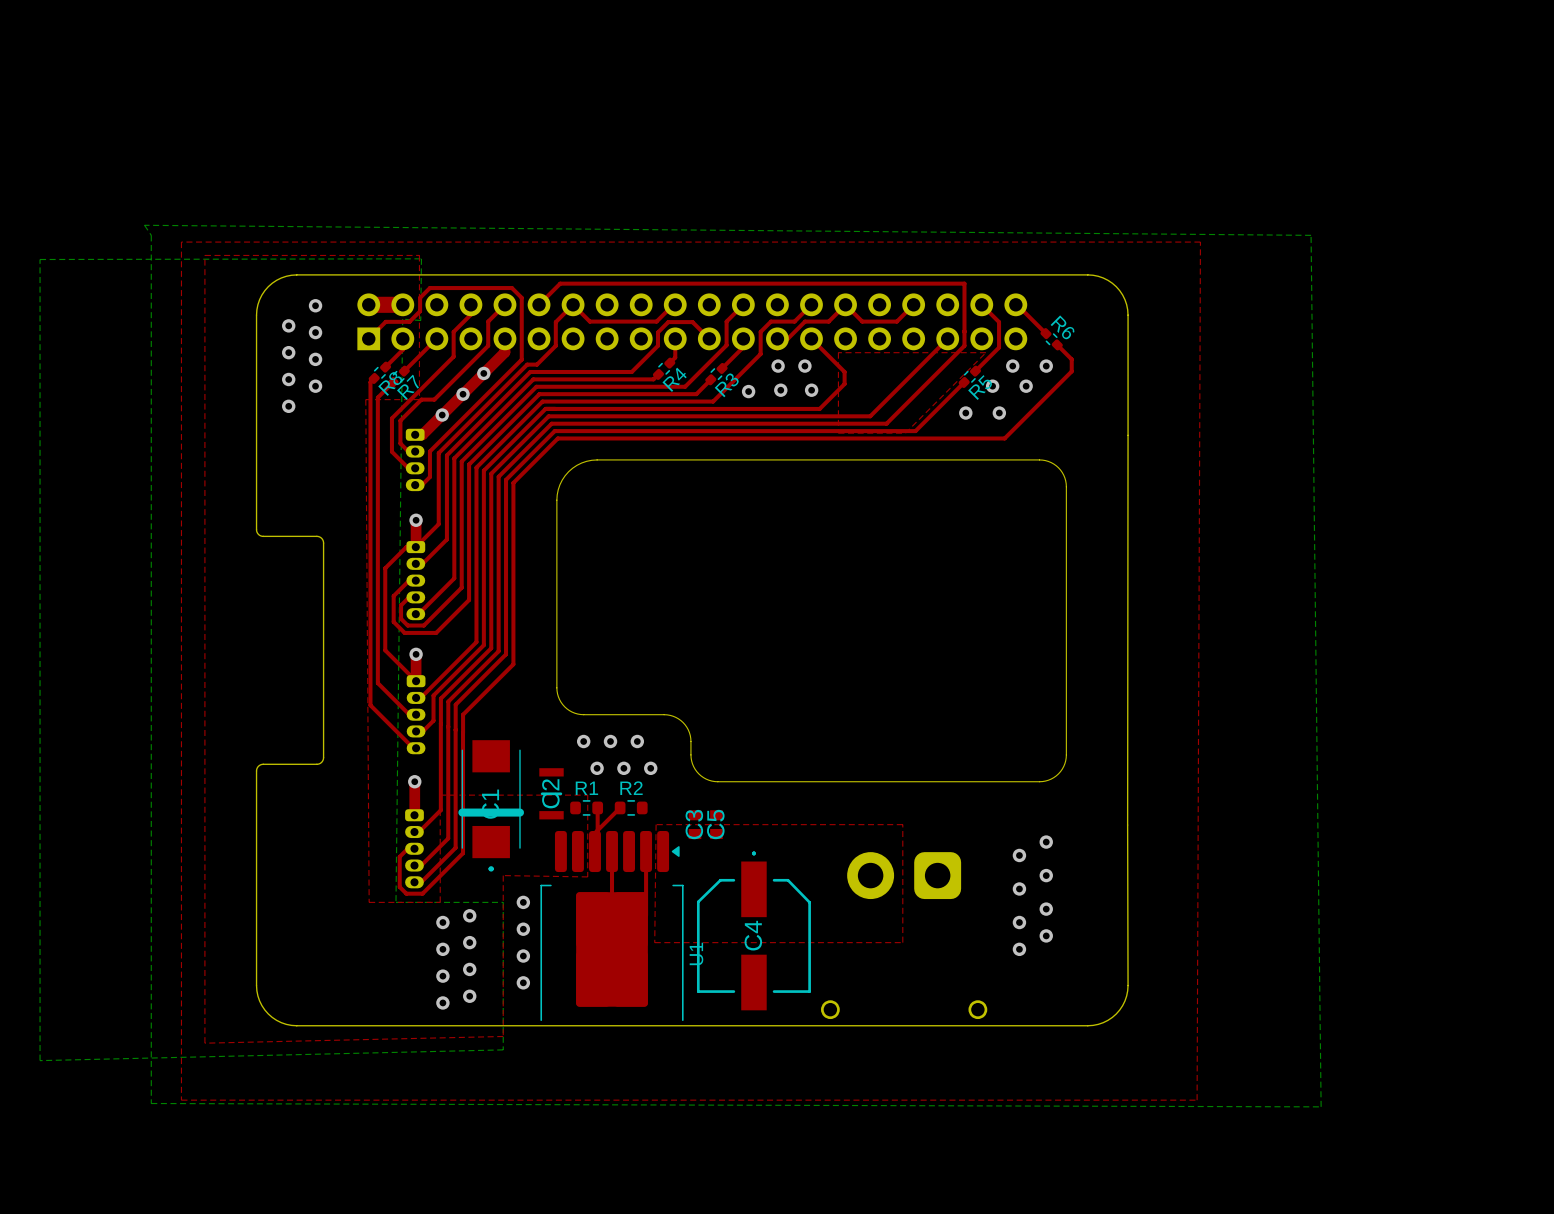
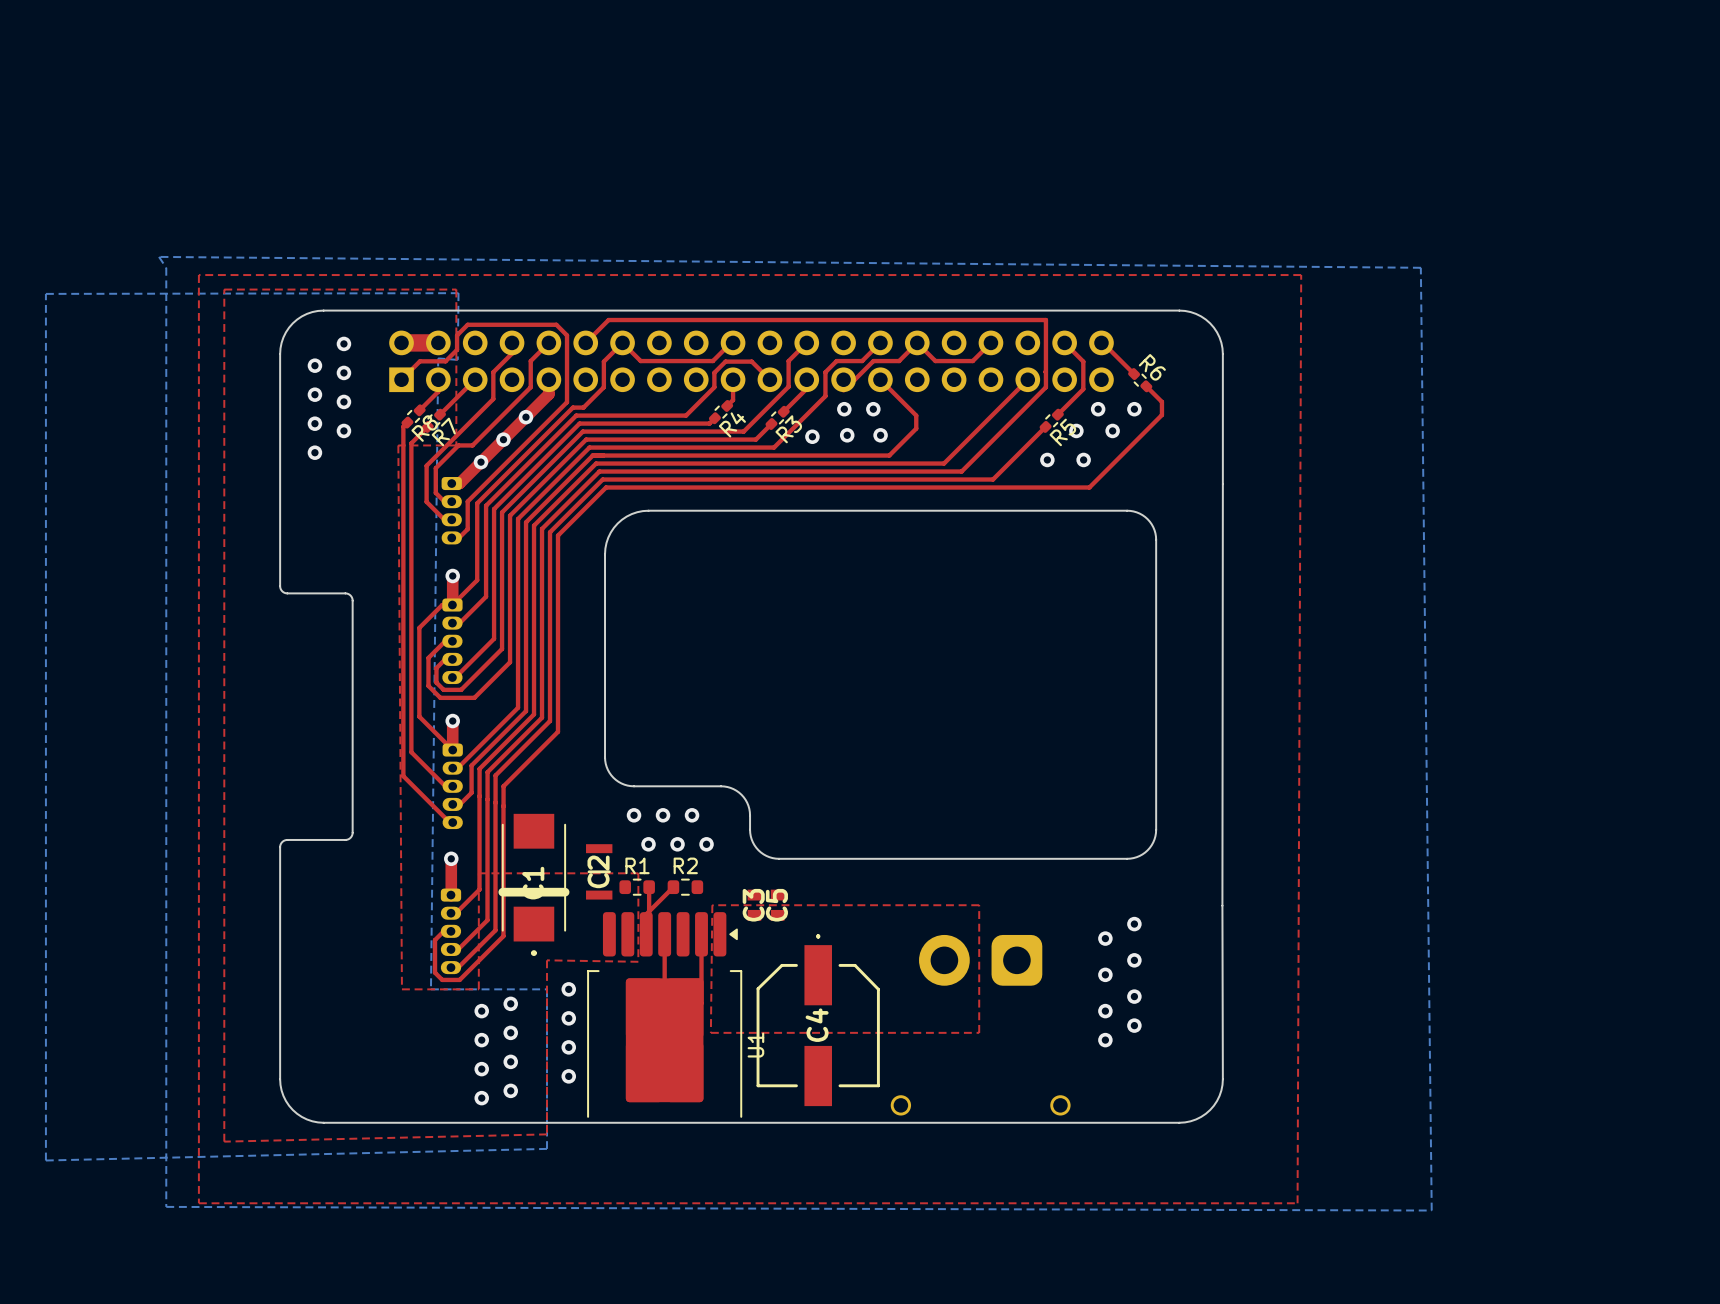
top zone outline: (838, 352) (838, 433) (905, 433) (985, 352) (838, 352) -> none

